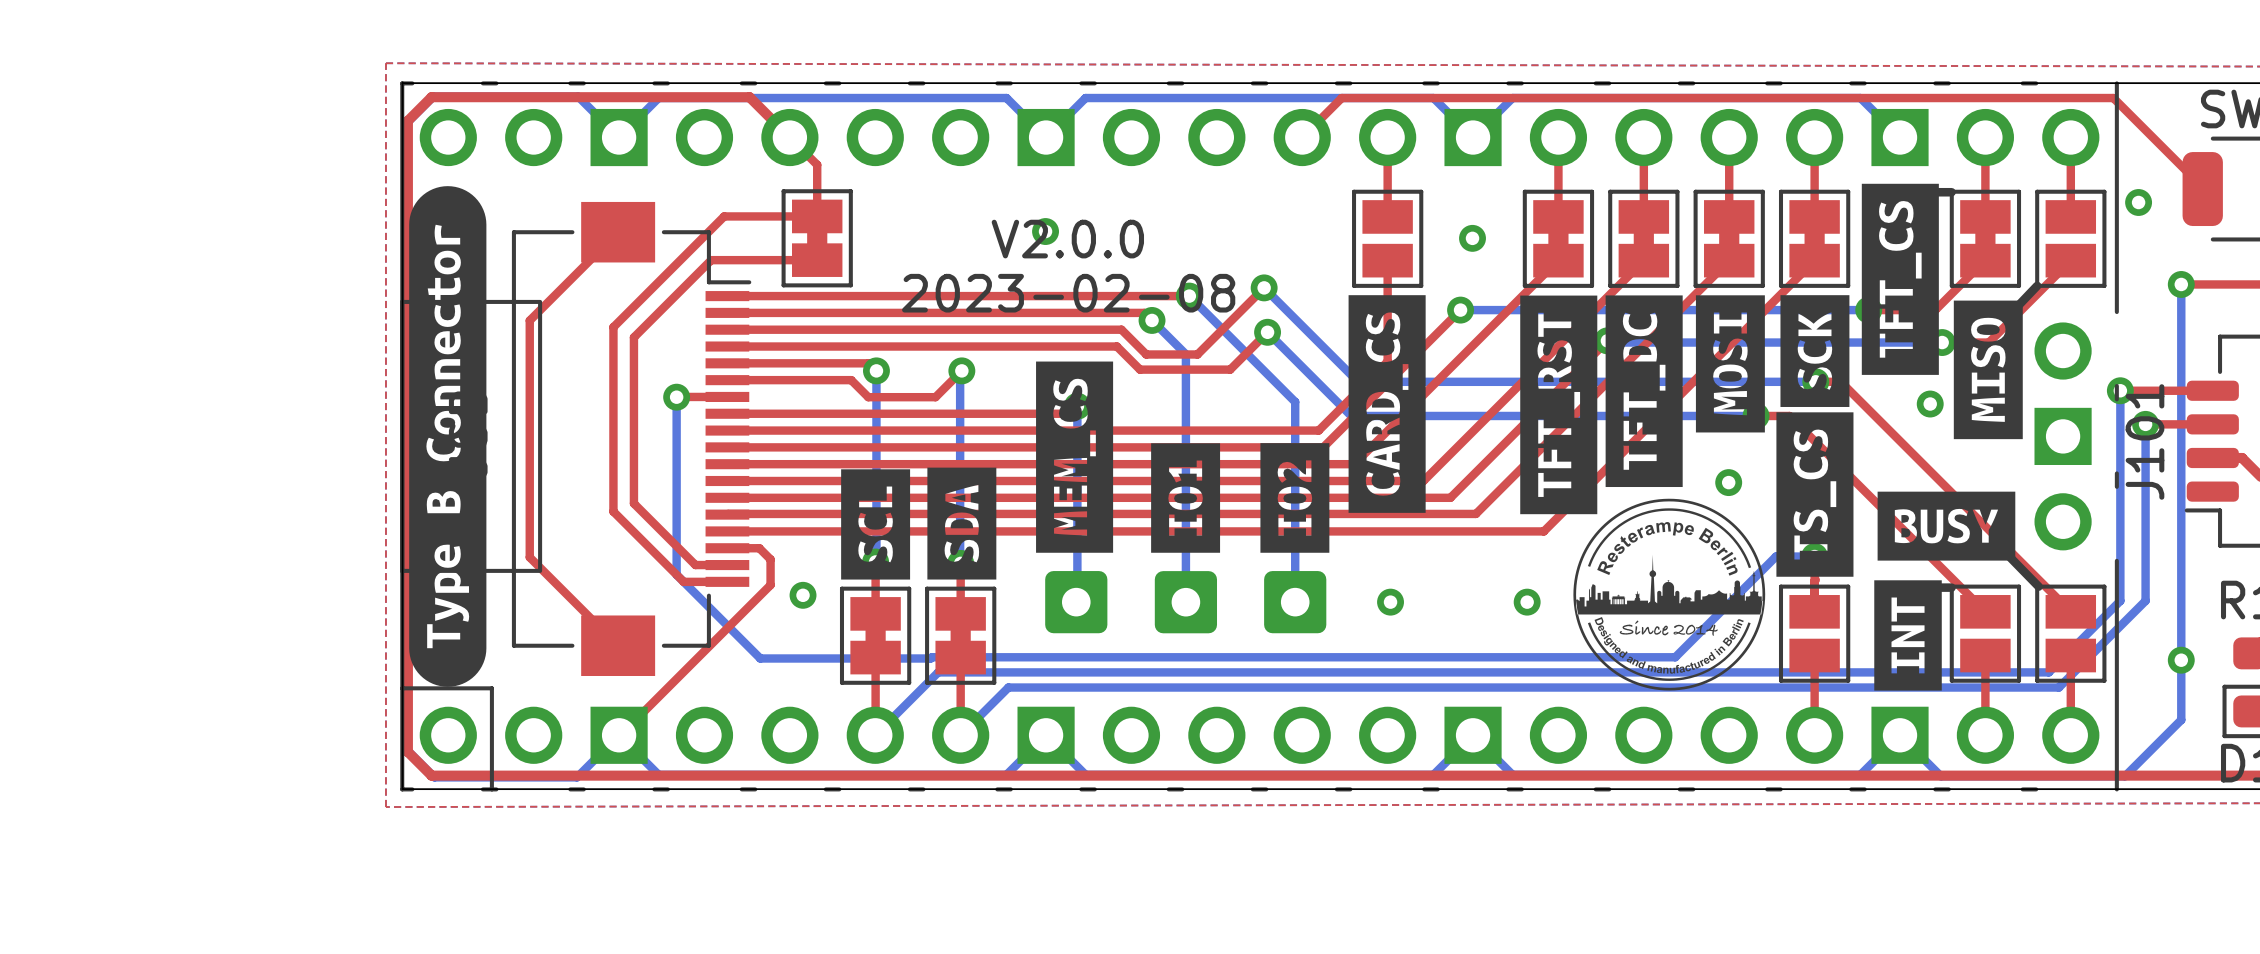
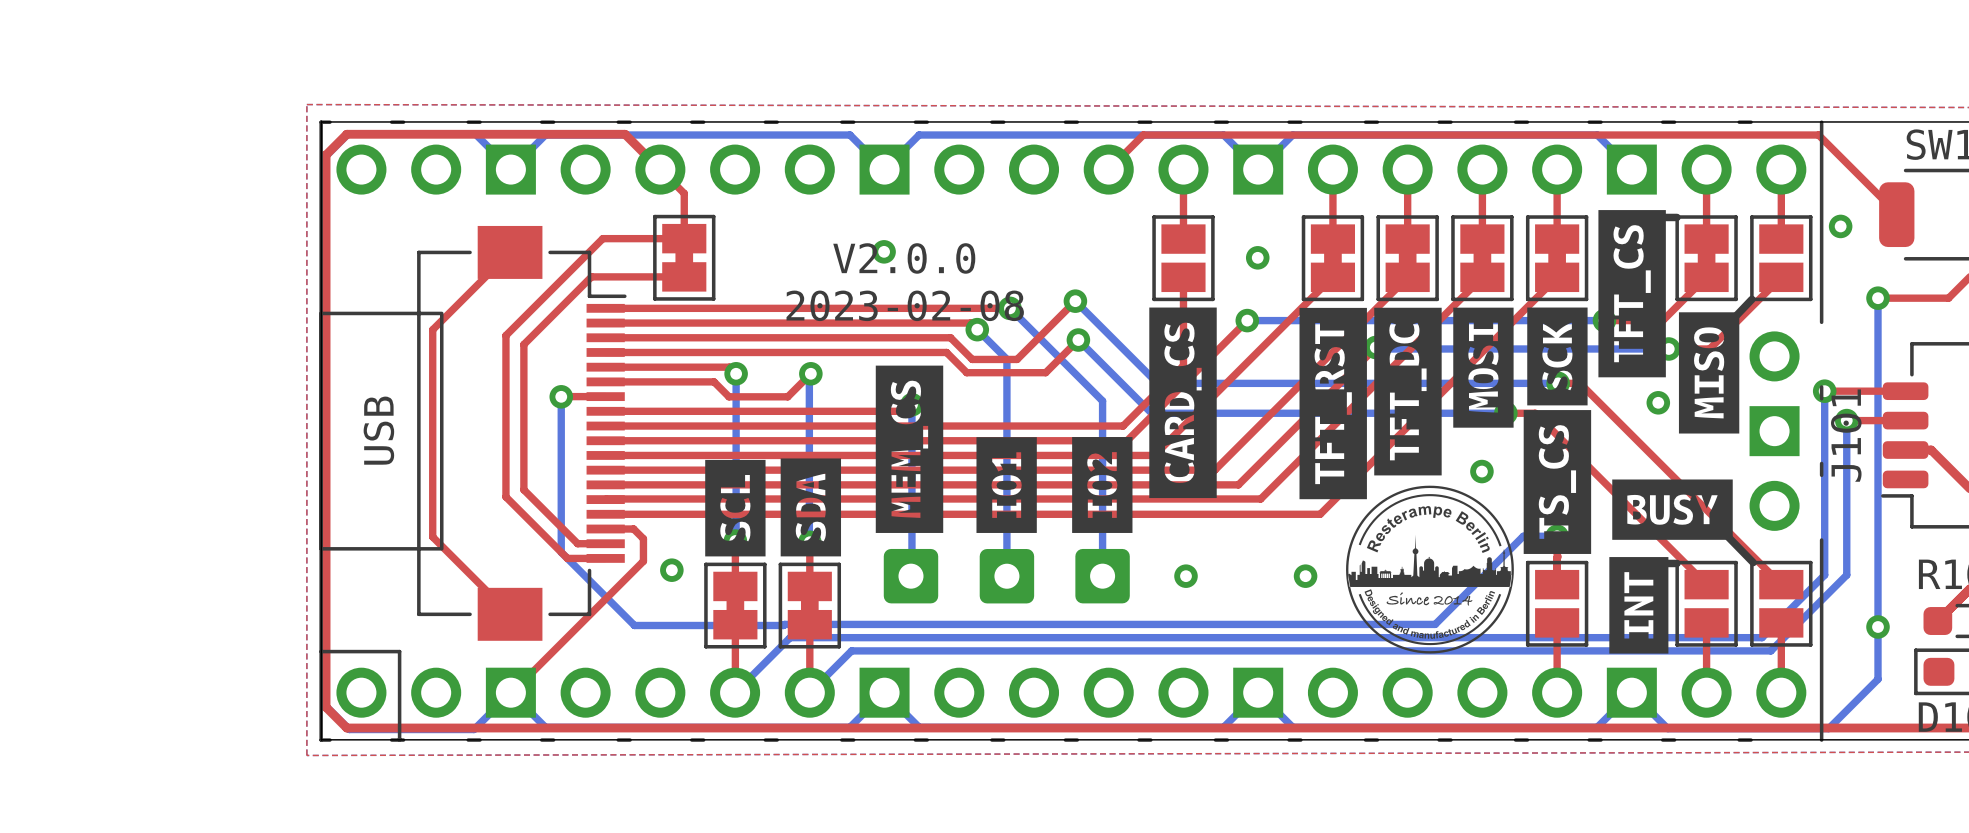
drawing: [409, 186, 487, 687] -> none

